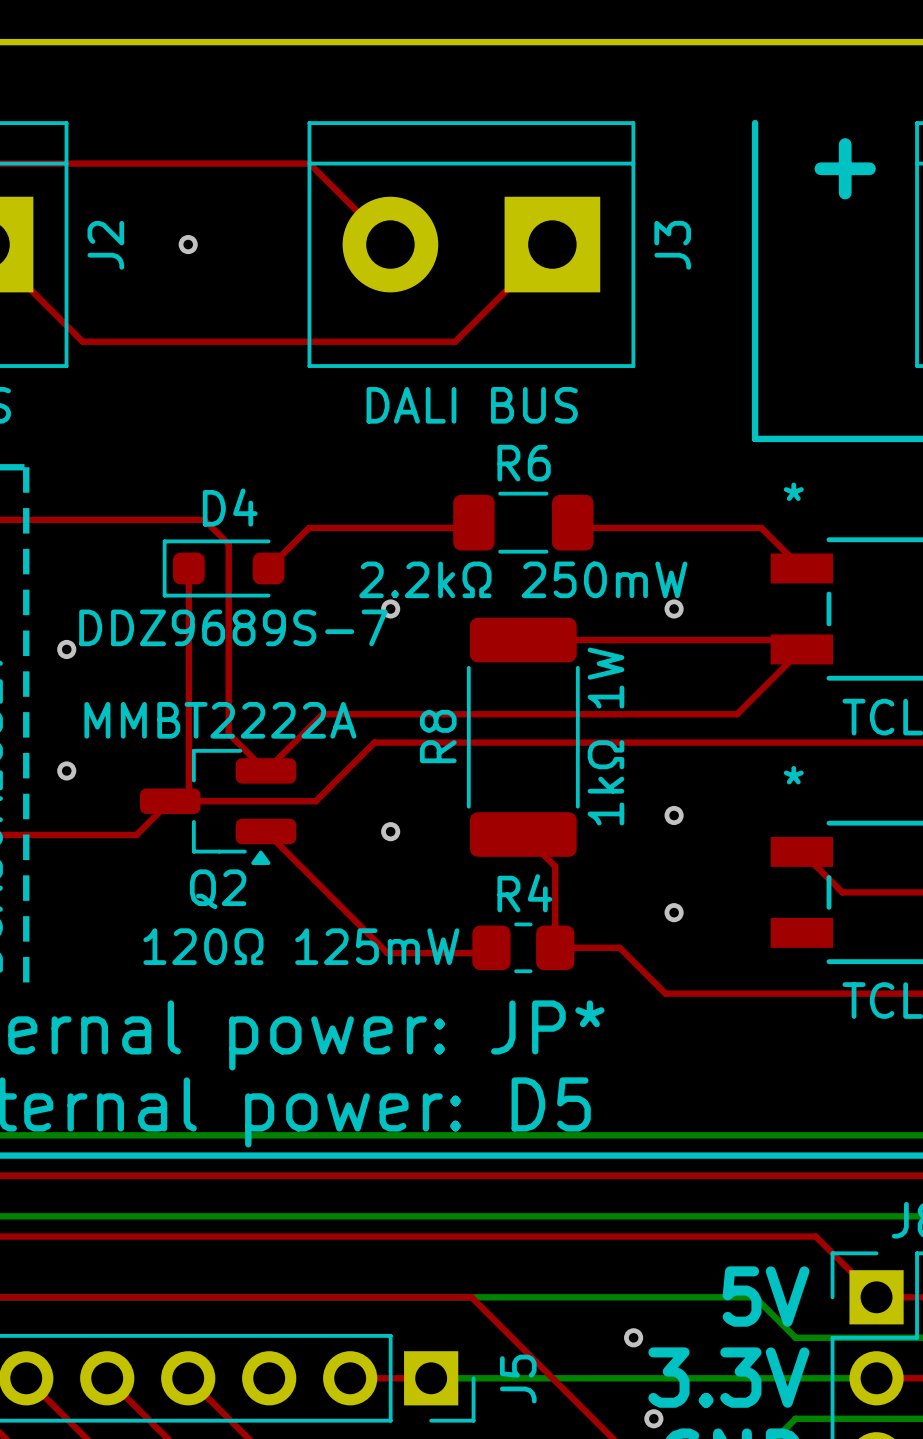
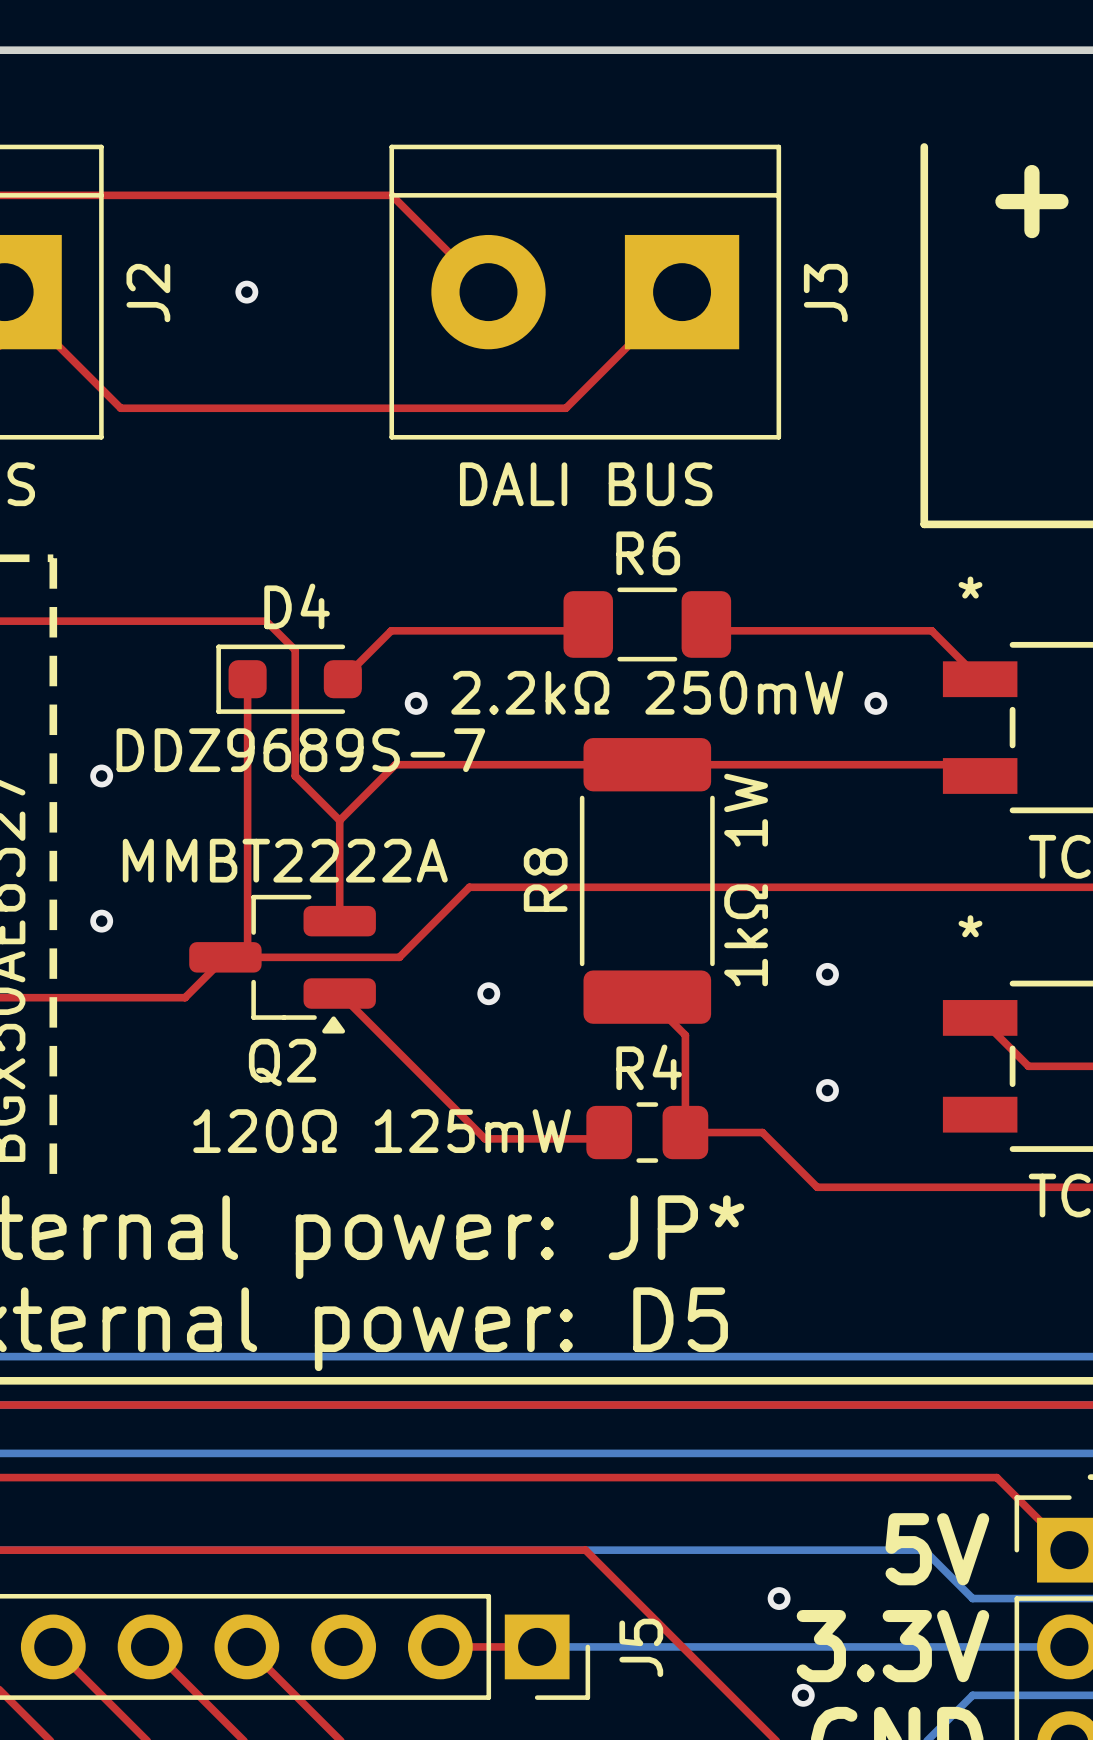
via position: (390, 608) -> (416, 703)
via position: (674, 608) -> (875, 703)
top track: none -> (647, 764) (395, 764) (339, 820)
top track: (228, 649) (228, 733) (265, 770) (322, 714) (737, 714) (801, 649) -> (295, 775) (339, 820)
top track: none -> (339, 820) (339, 921)

